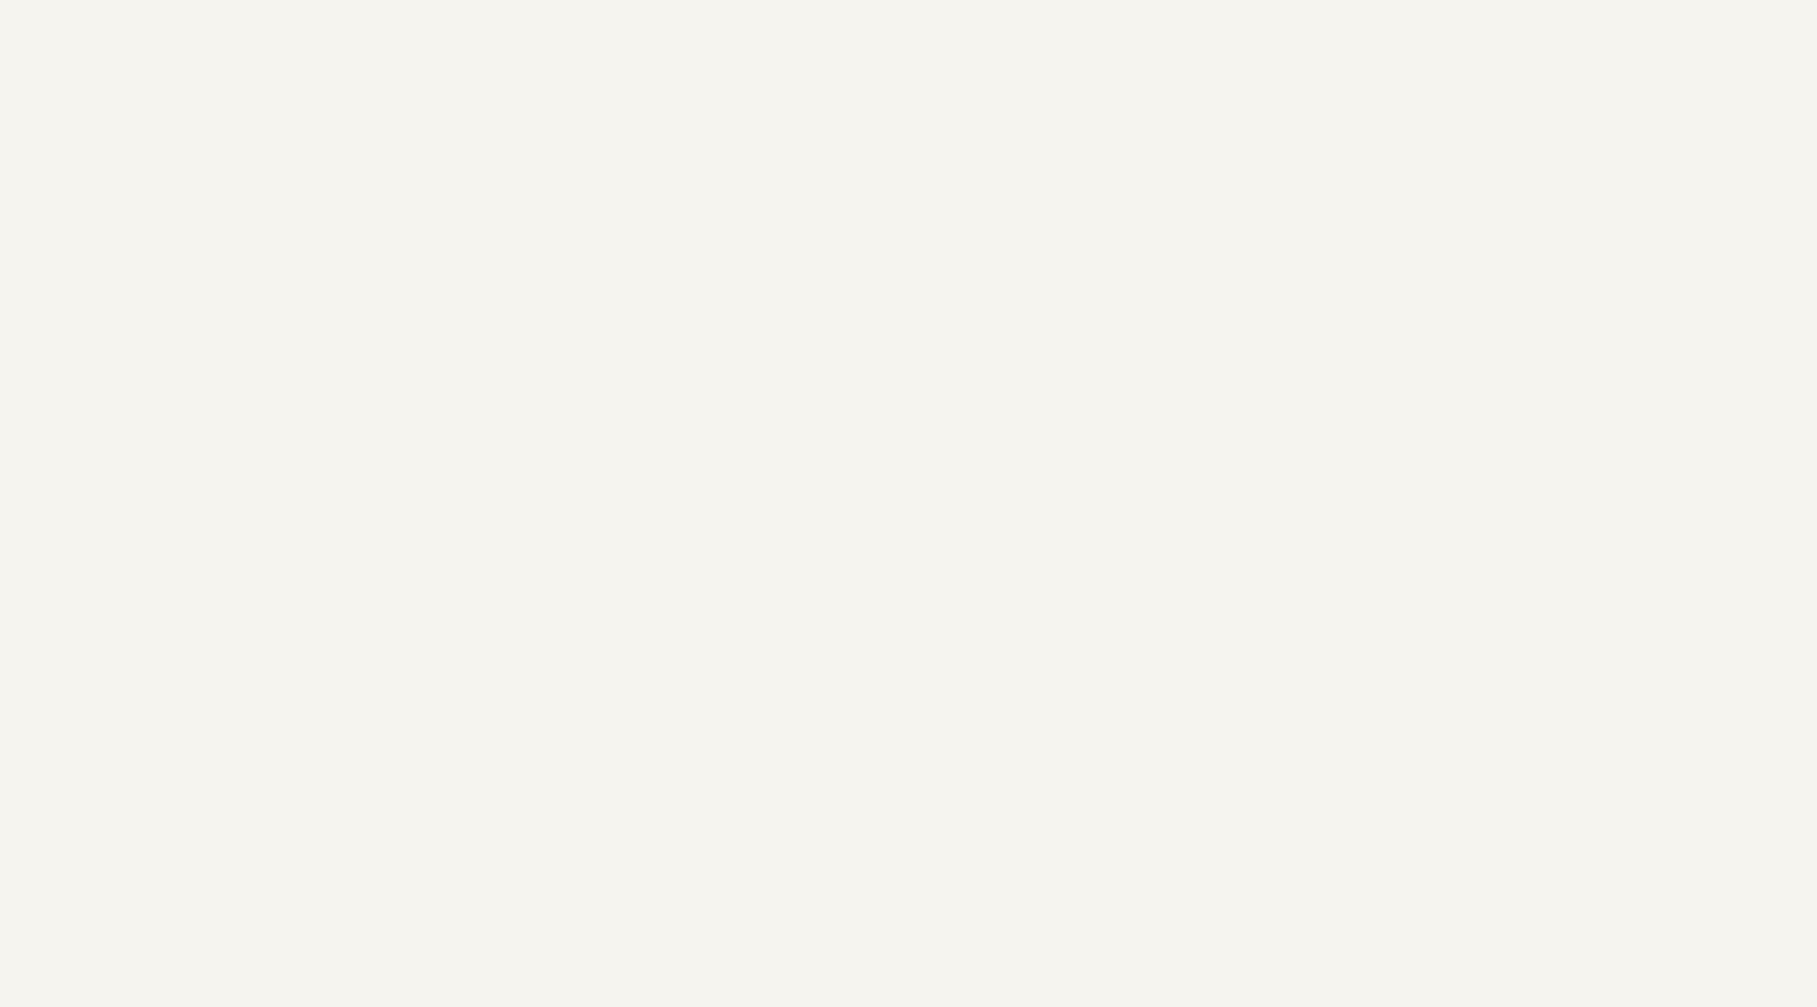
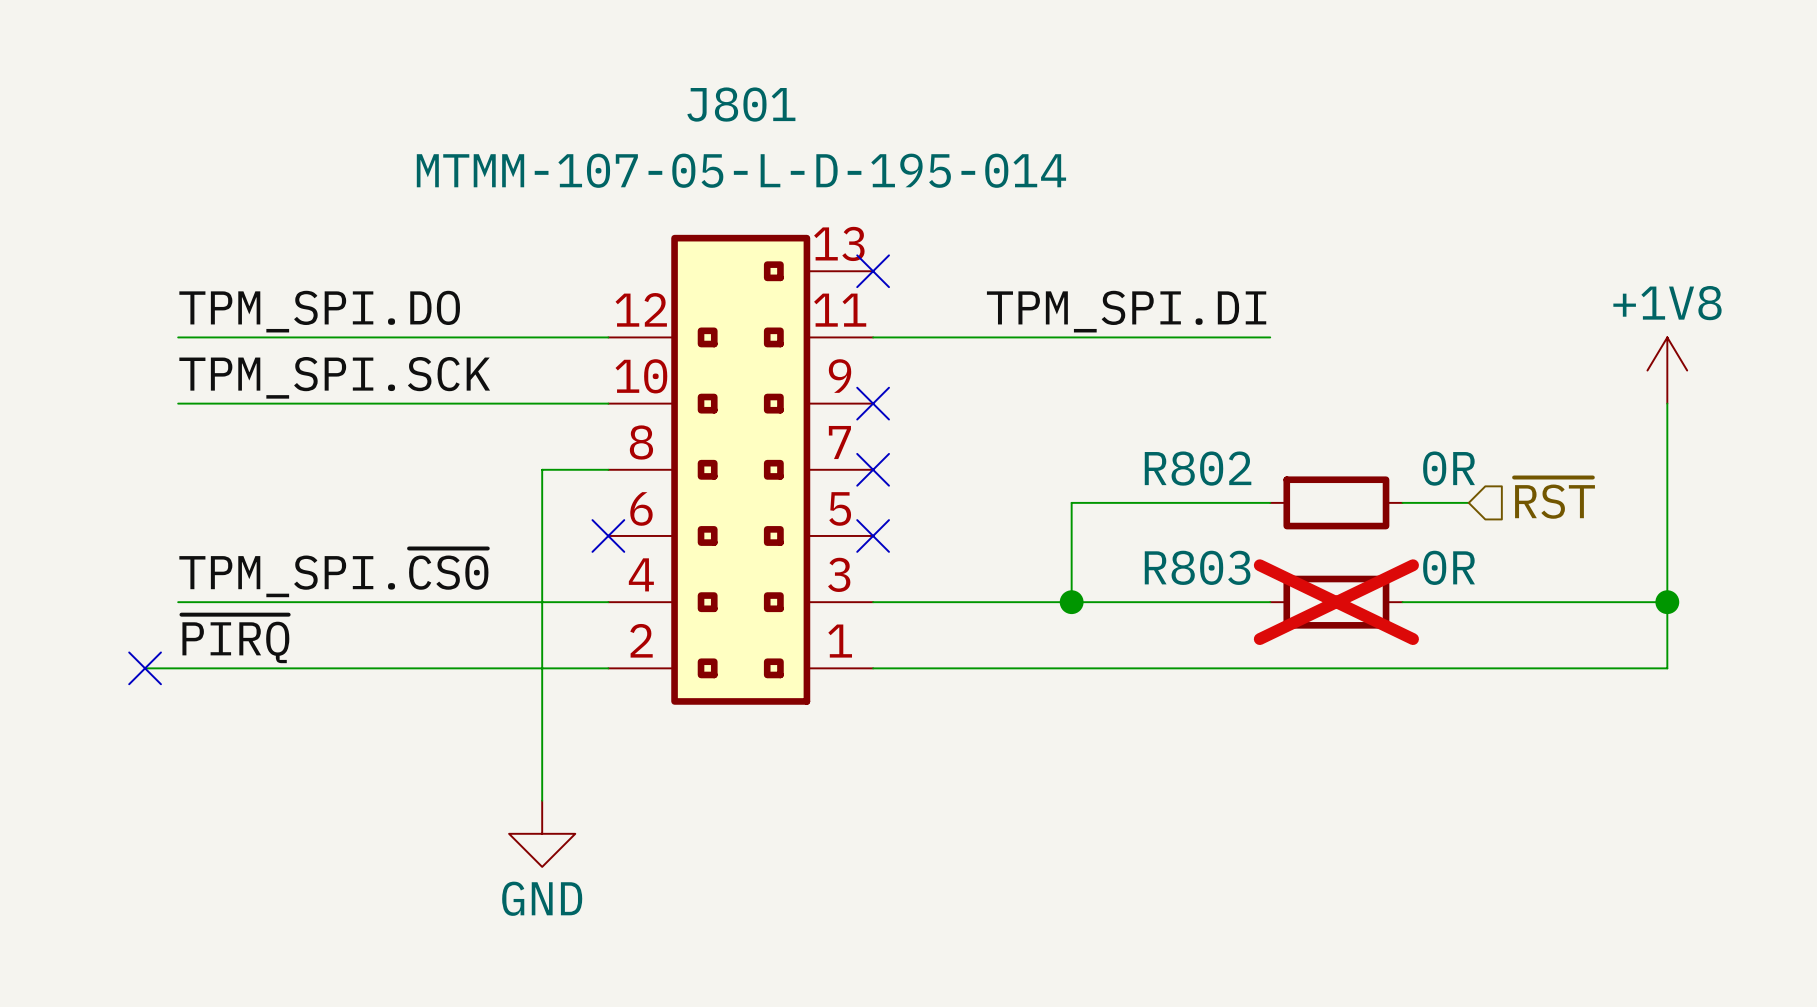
no-connect mark: none -> (873, 271)
label: none -> TPM_SPI.DO (319, 311)
label: none -> TPM_SPI.DI (1126, 311)
wire: none -> (178, 337) (608, 337)
wire: none -> (873, 337) (1270, 337)
power symbol: none -> +1V8 (1667, 370)
label: none -> TPM_SPI.SCK (334, 377)
wire: none -> (178, 403) (608, 403)
no-connect mark: none -> (873, 403)
wire: none -> (1667, 403) (1667, 668) (873, 668)
wire: none -> (608, 469) (542, 469) (542, 800)
J801: none -> (740, 469)
no-connect mark: none -> (873, 469)
hierarchical label: none -> ~{RST} (1554, 498)
wire: none -> (1270, 502) (1071, 502) (1071, 602)
R802: none -> (1336, 502)
wire: none -> (1402, 502) (1468, 502)
no-connect mark: none -> (608, 535)
no-connect mark: none -> (873, 535)
label: none -> TPM_SPI.~{CS0} (333, 572)
wire: none -> (178, 602) (608, 602)
wire: none -> (873, 602) (1270, 602)
junction: none -> (1071, 602)
R803: none -> (1336, 602)
wire: none -> (1402, 602) (1667, 602)
junction: none -> (1667, 602)
label: none -> ~{PIRQ} (235, 638)
wire: none -> (145, 668) (608, 668)
no-connect mark: none -> (145, 668)
power symbol: none -> GND (542, 833)

